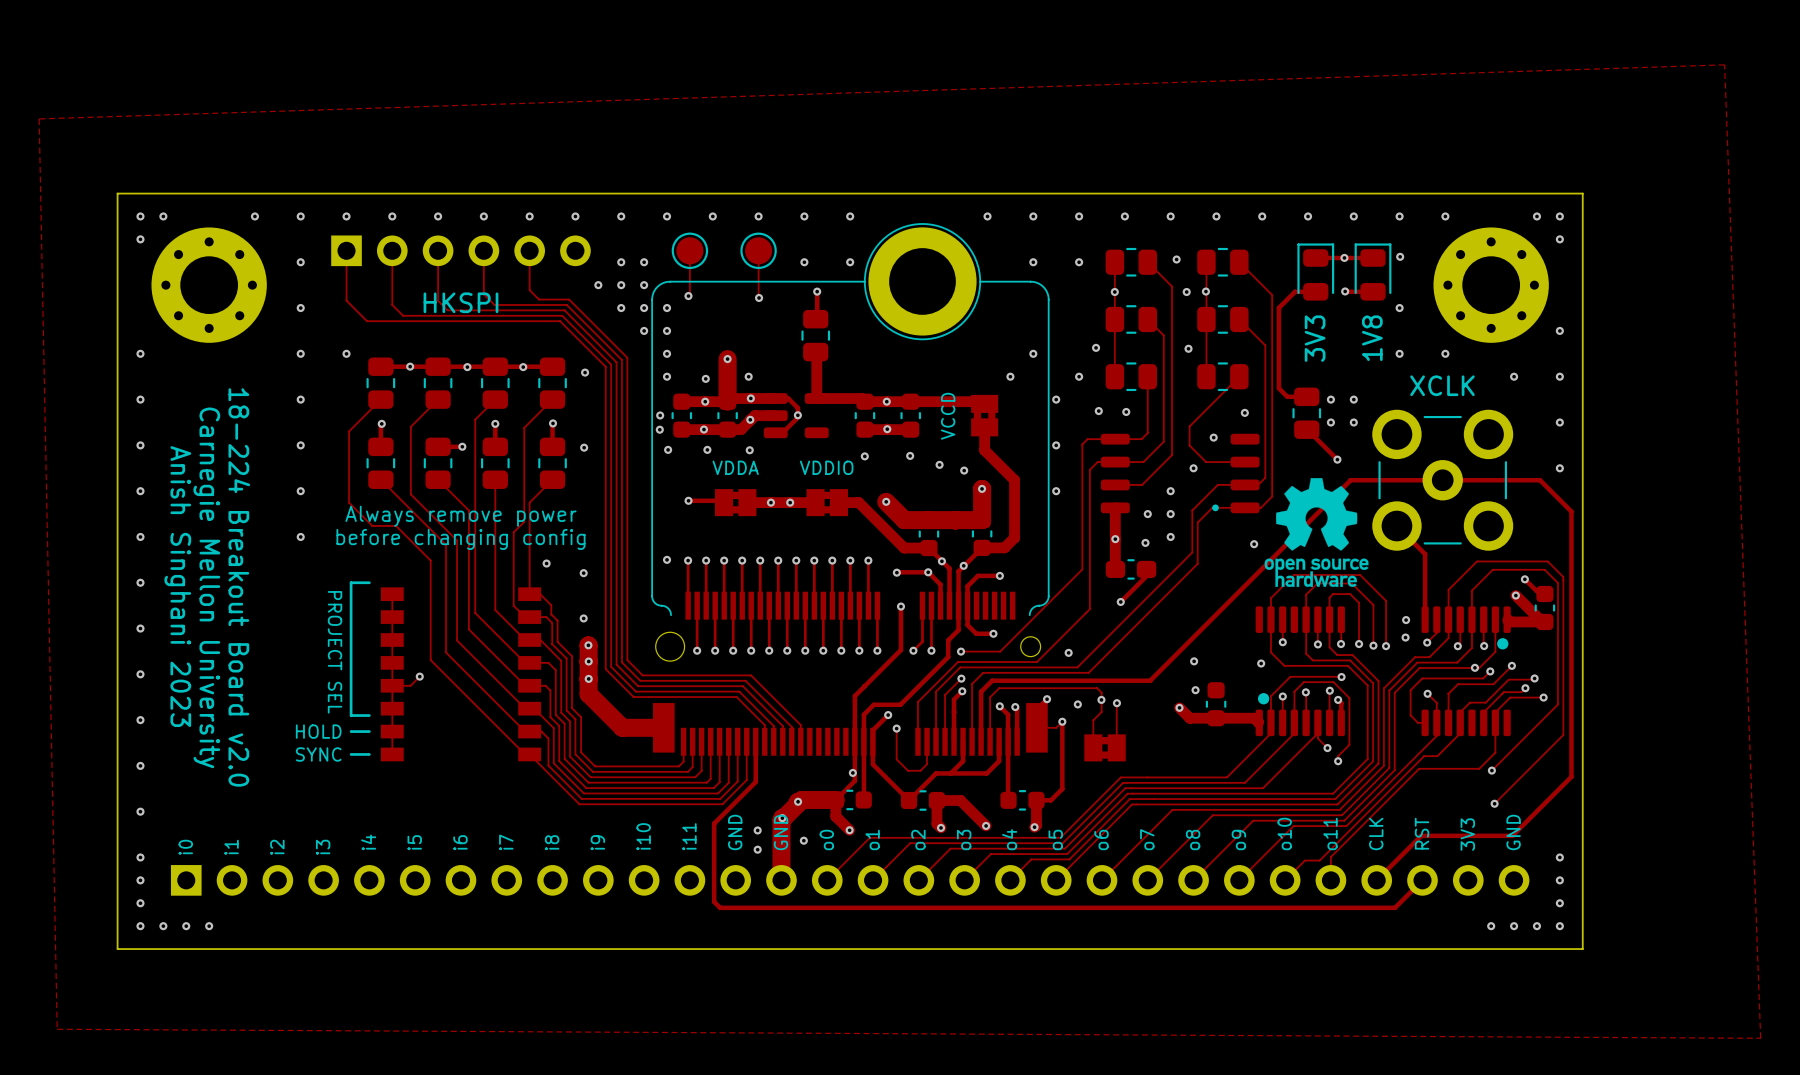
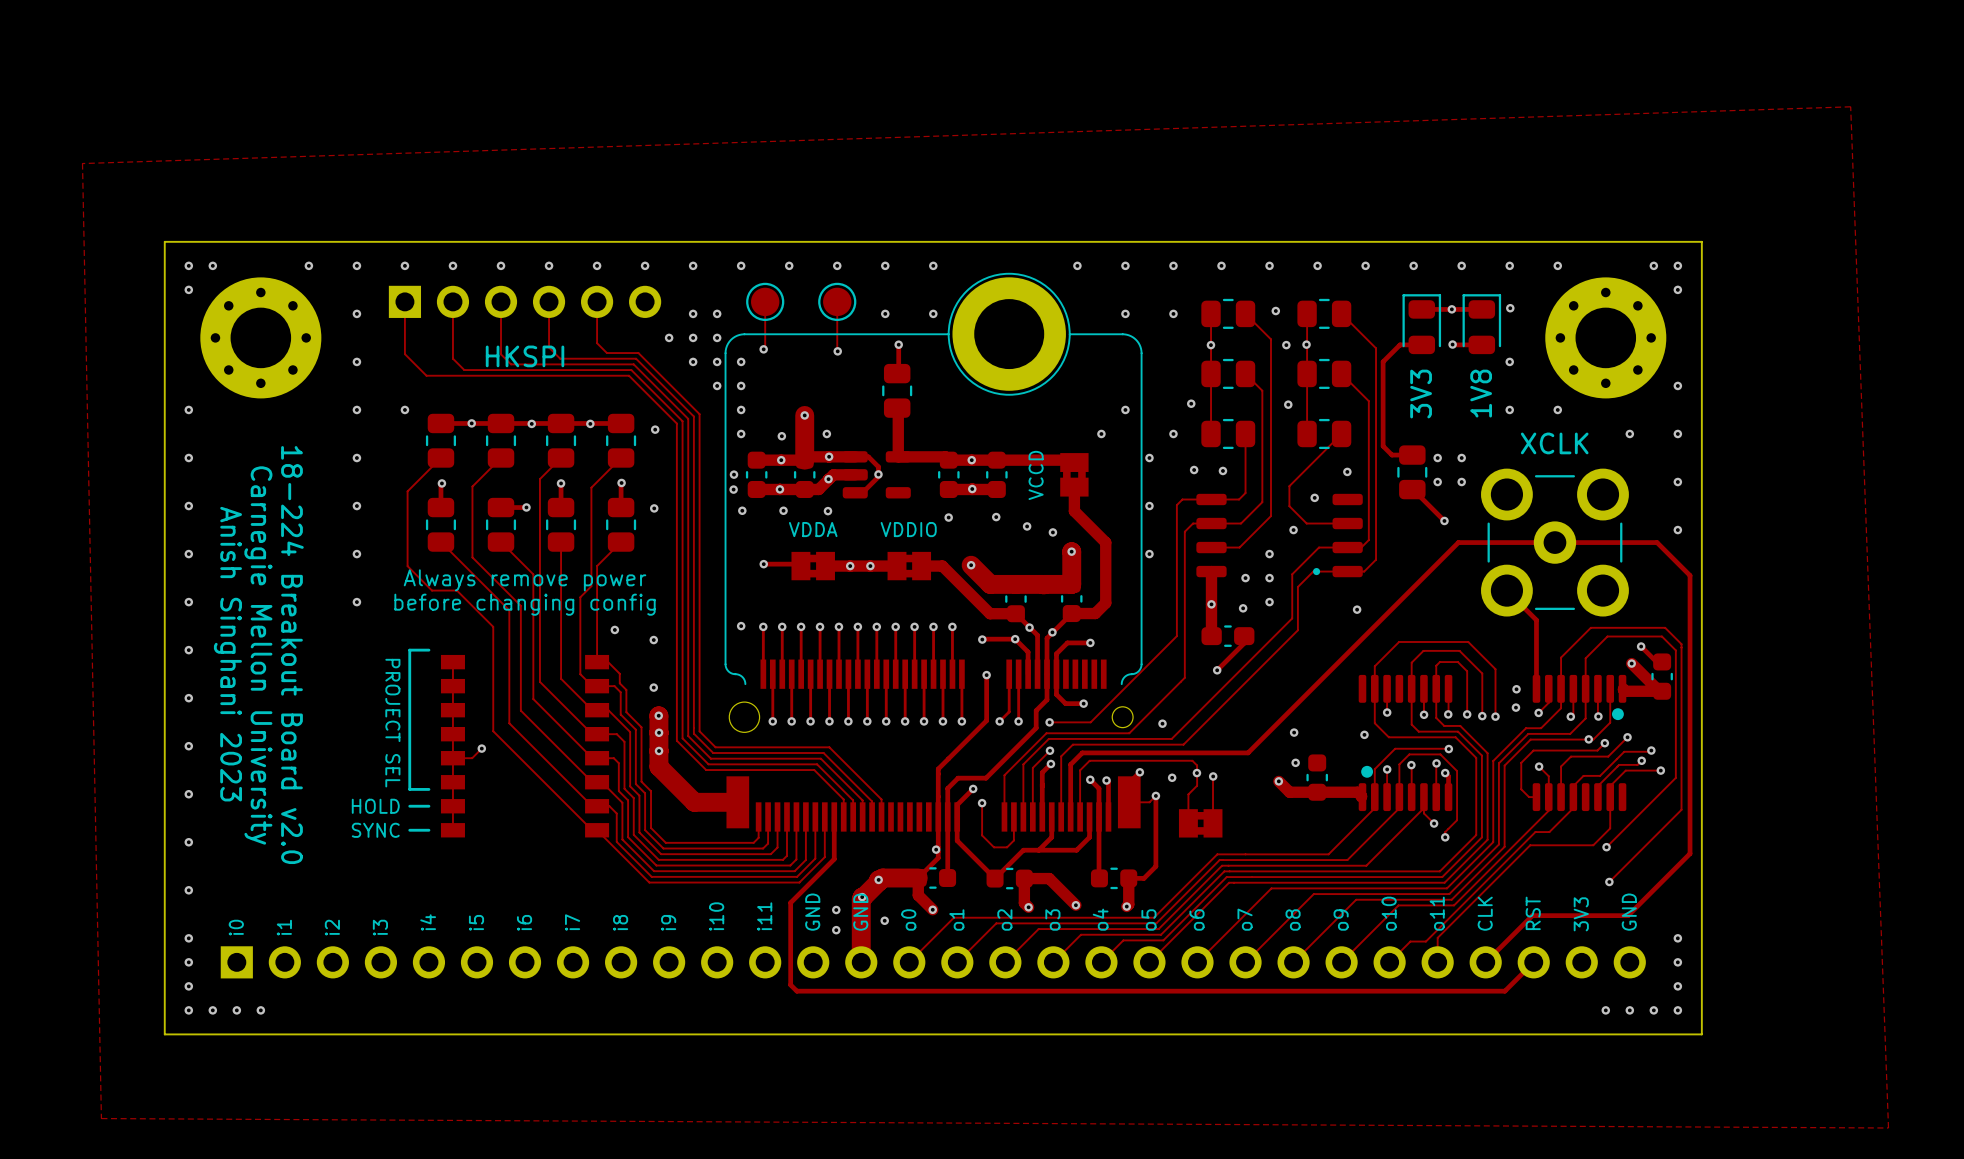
drawing: [1264, 478, 1369, 587] -> none

